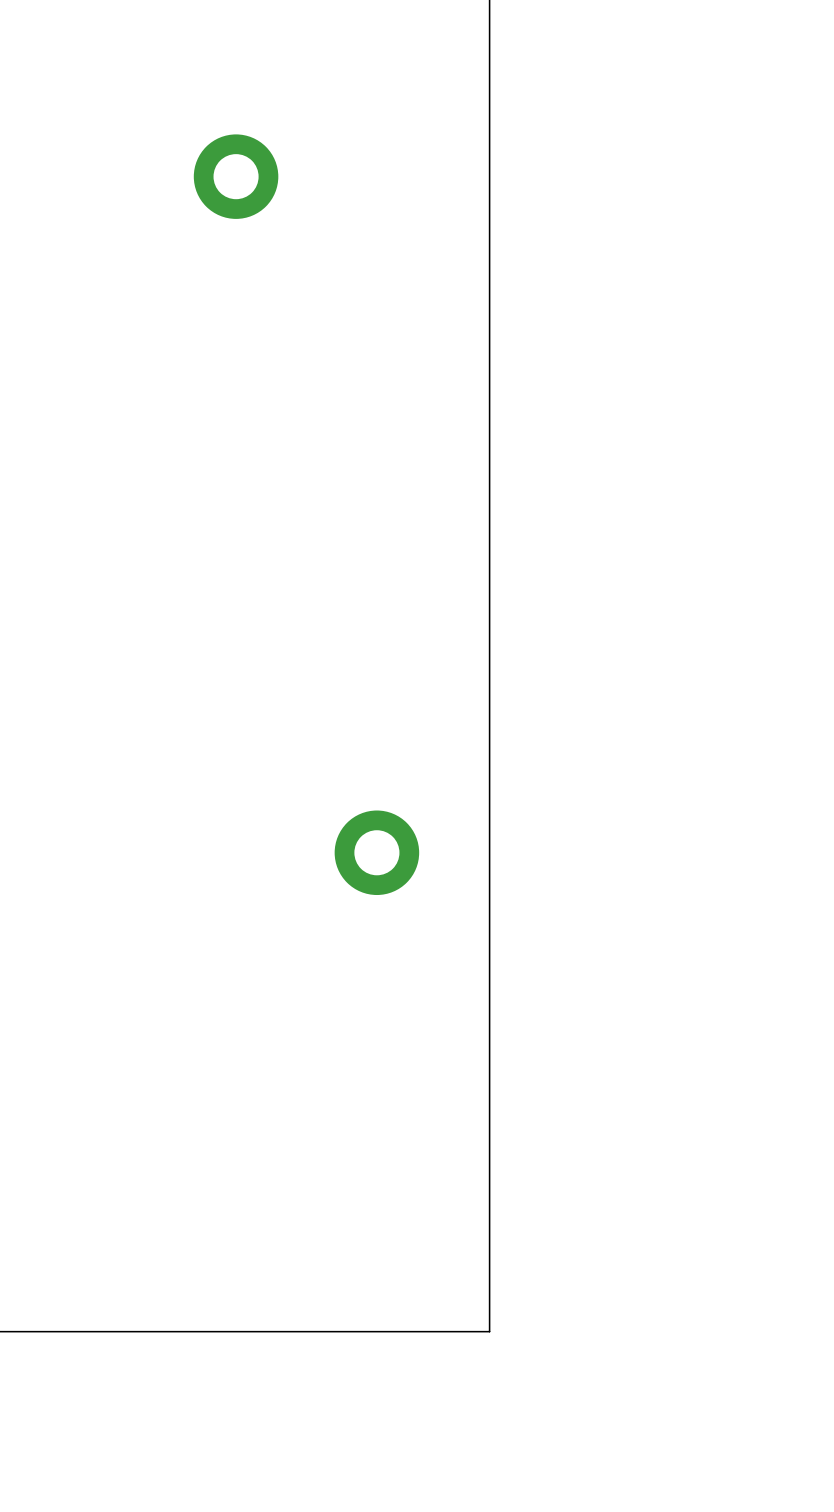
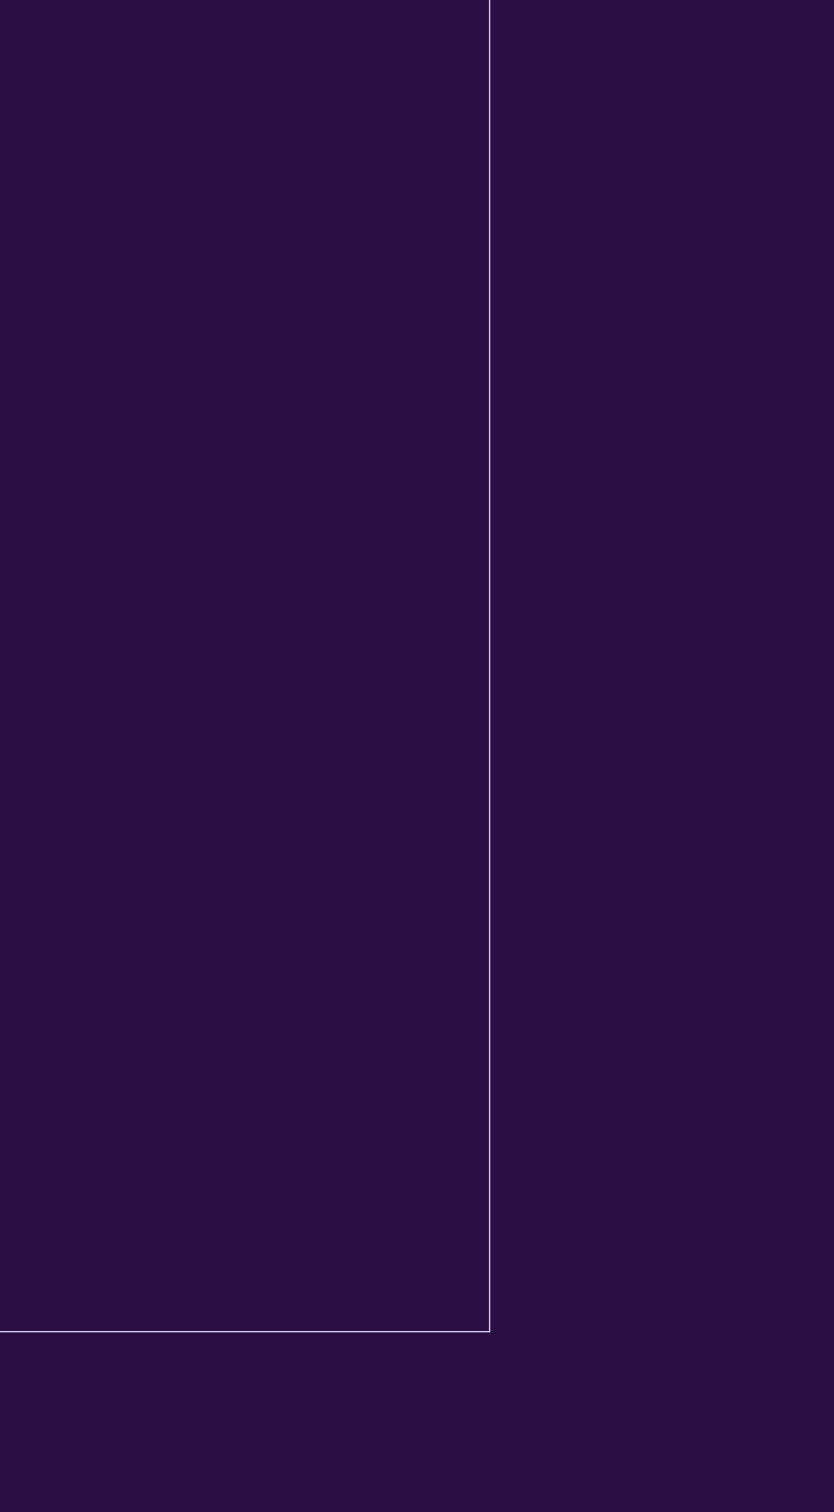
via: (236, 176) -> none
via: (376, 852) -> none

